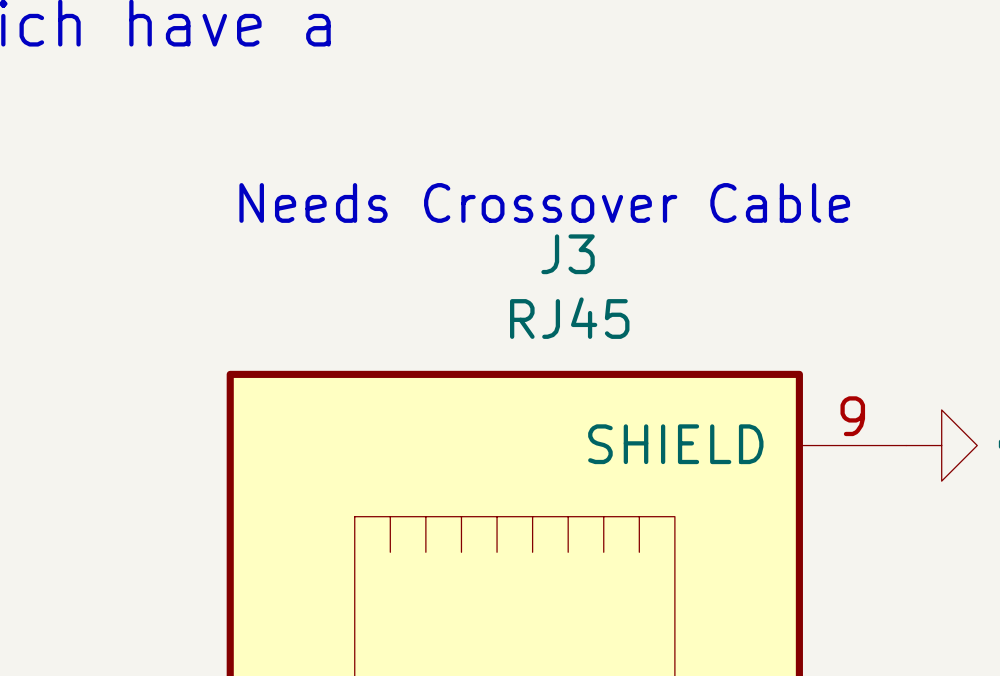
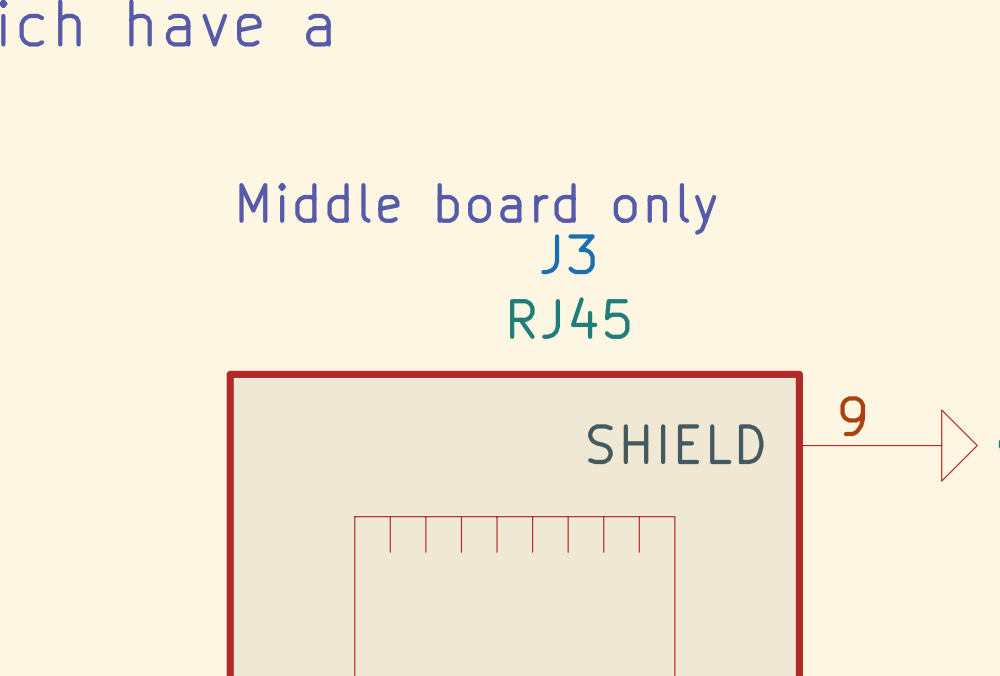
text: Needs Crossover Cable (544, 202) -> Middle board only (477, 208)

